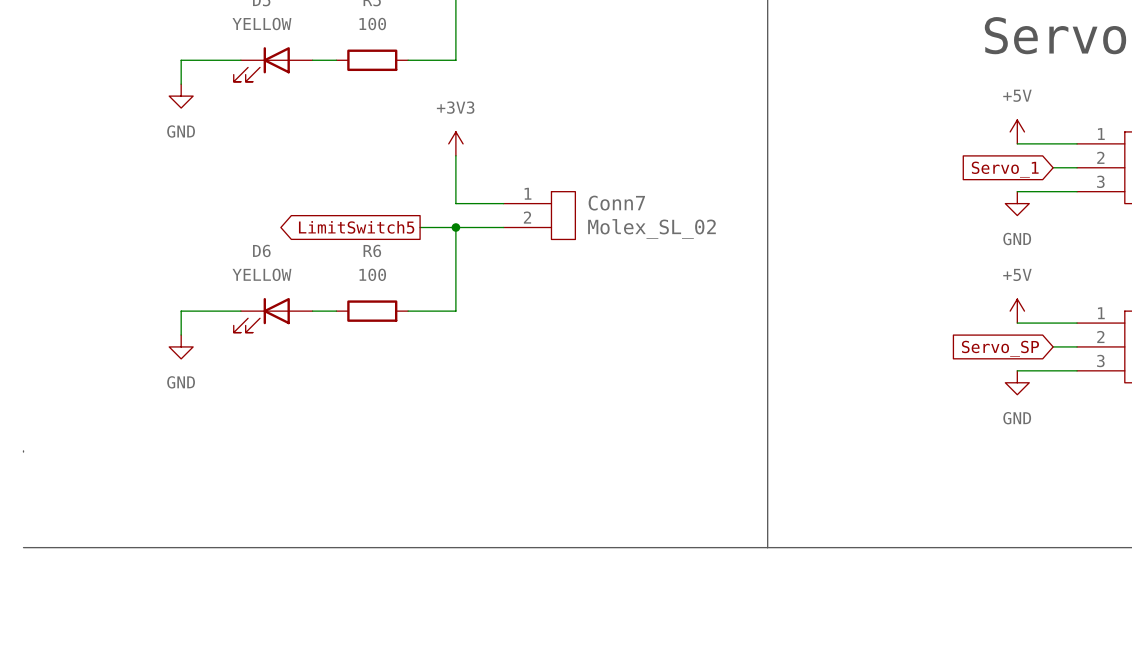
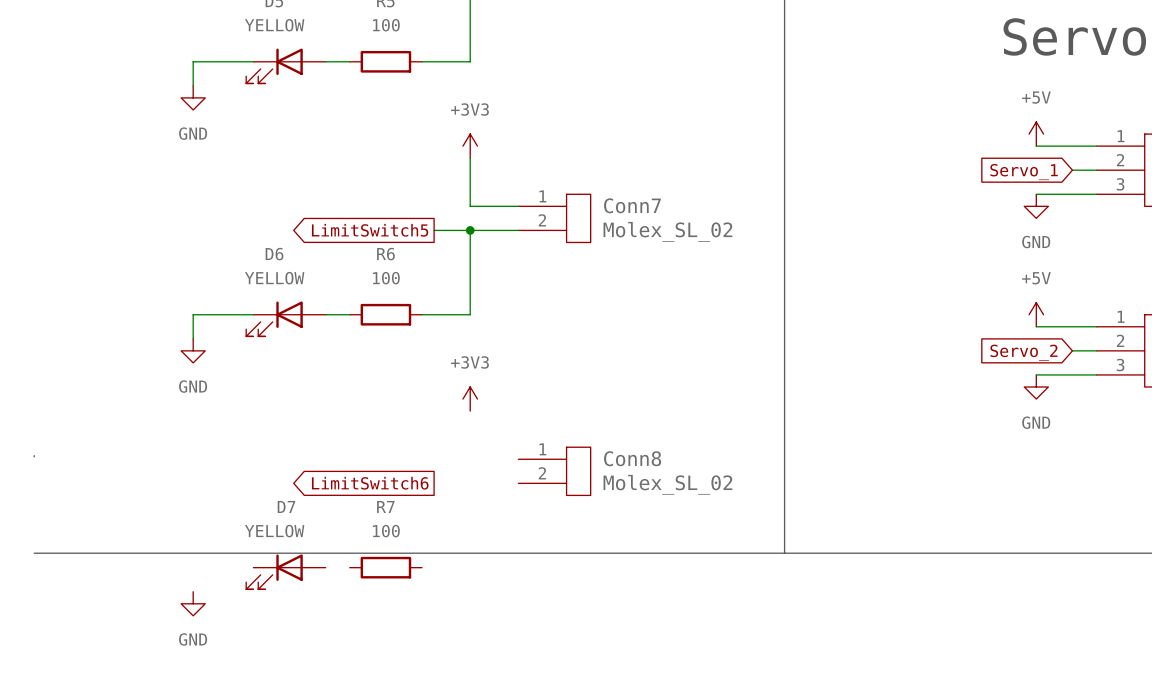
global label: Servo_SP (1000, 348) -> Servo_2 (1023, 352)
power symbol: none -> +3V3 (470, 399)
Conn8: none -> Molex_SL_02 (554, 471)
global label: none -> LimitSwitch6 (370, 483)
R7: none -> 100 (385, 567)
D7: none -> YELLOW (285, 571)
power symbol: none -> GND (193, 603)

